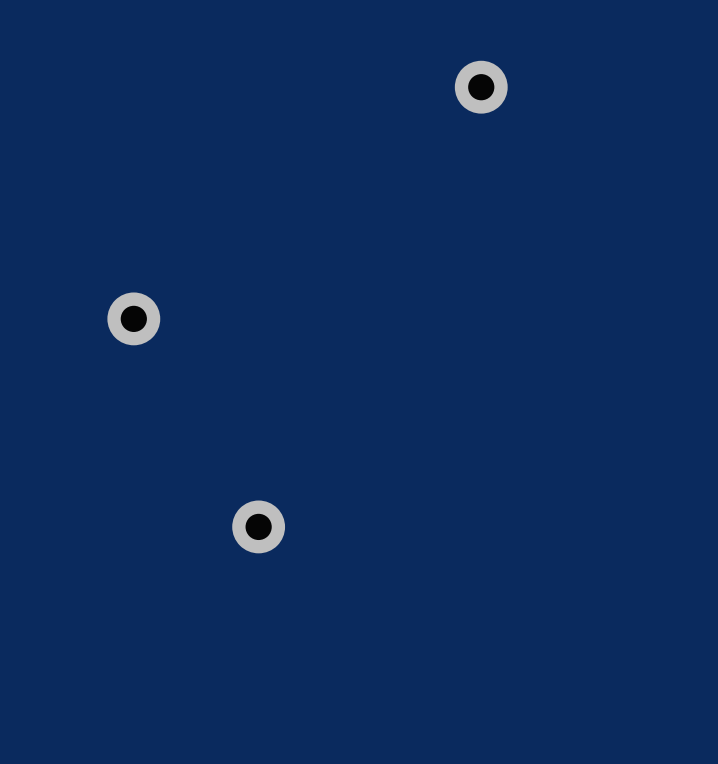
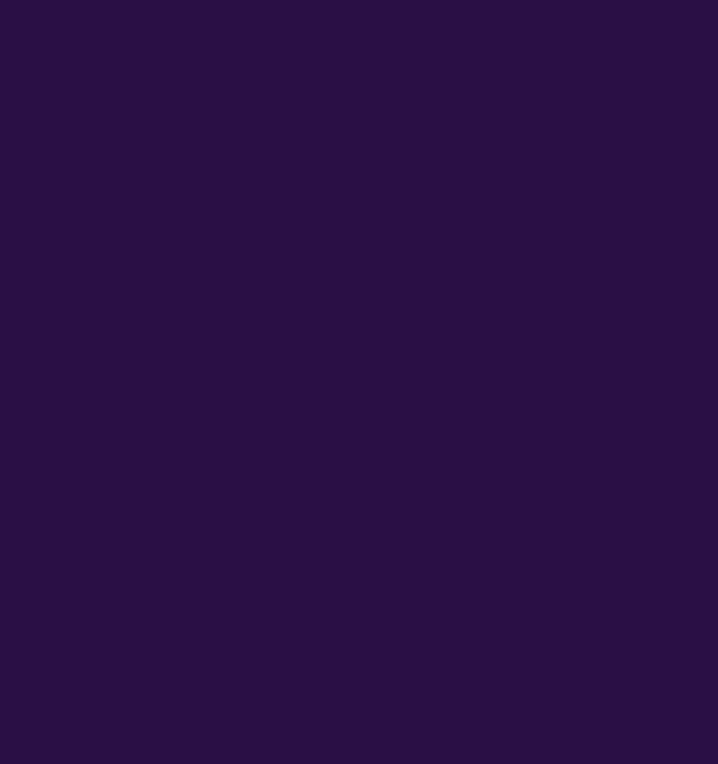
via: (481, 87) -> none
via: (133, 318) -> none
via: (258, 526) -> none

